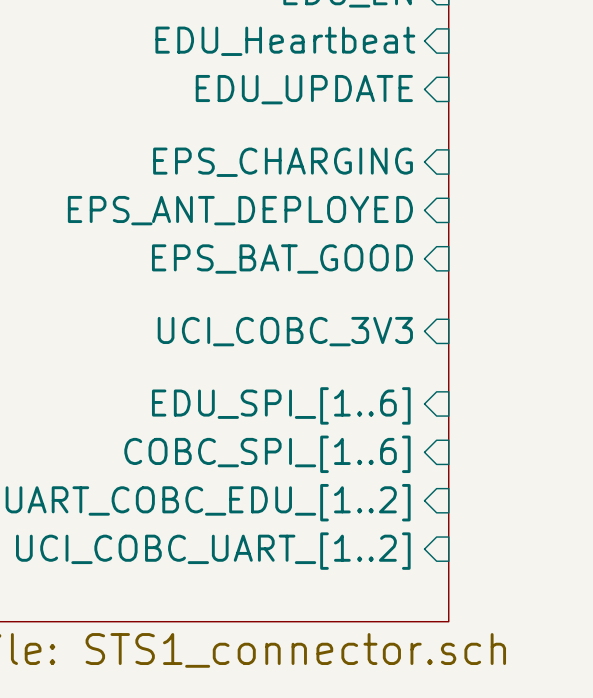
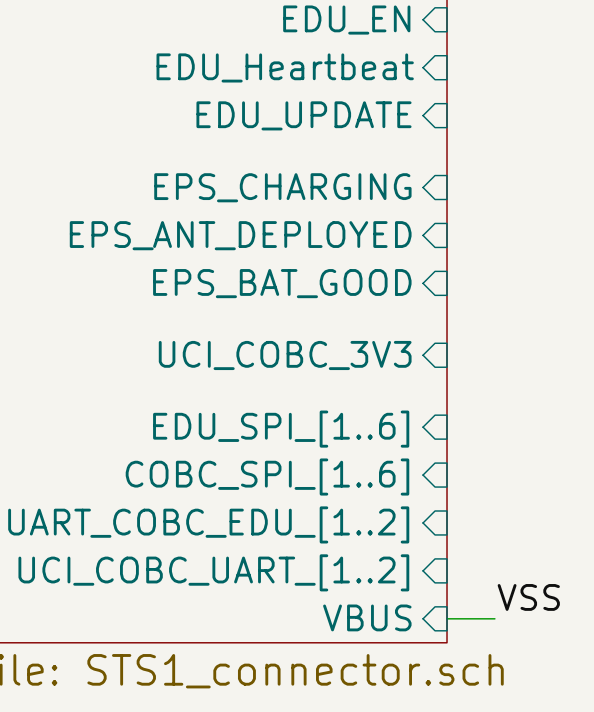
label: none -> VSS (528, 597)
sheet pin: none -> VBUS (367, 617)
wire: none -> (447, 618) (494, 618)

